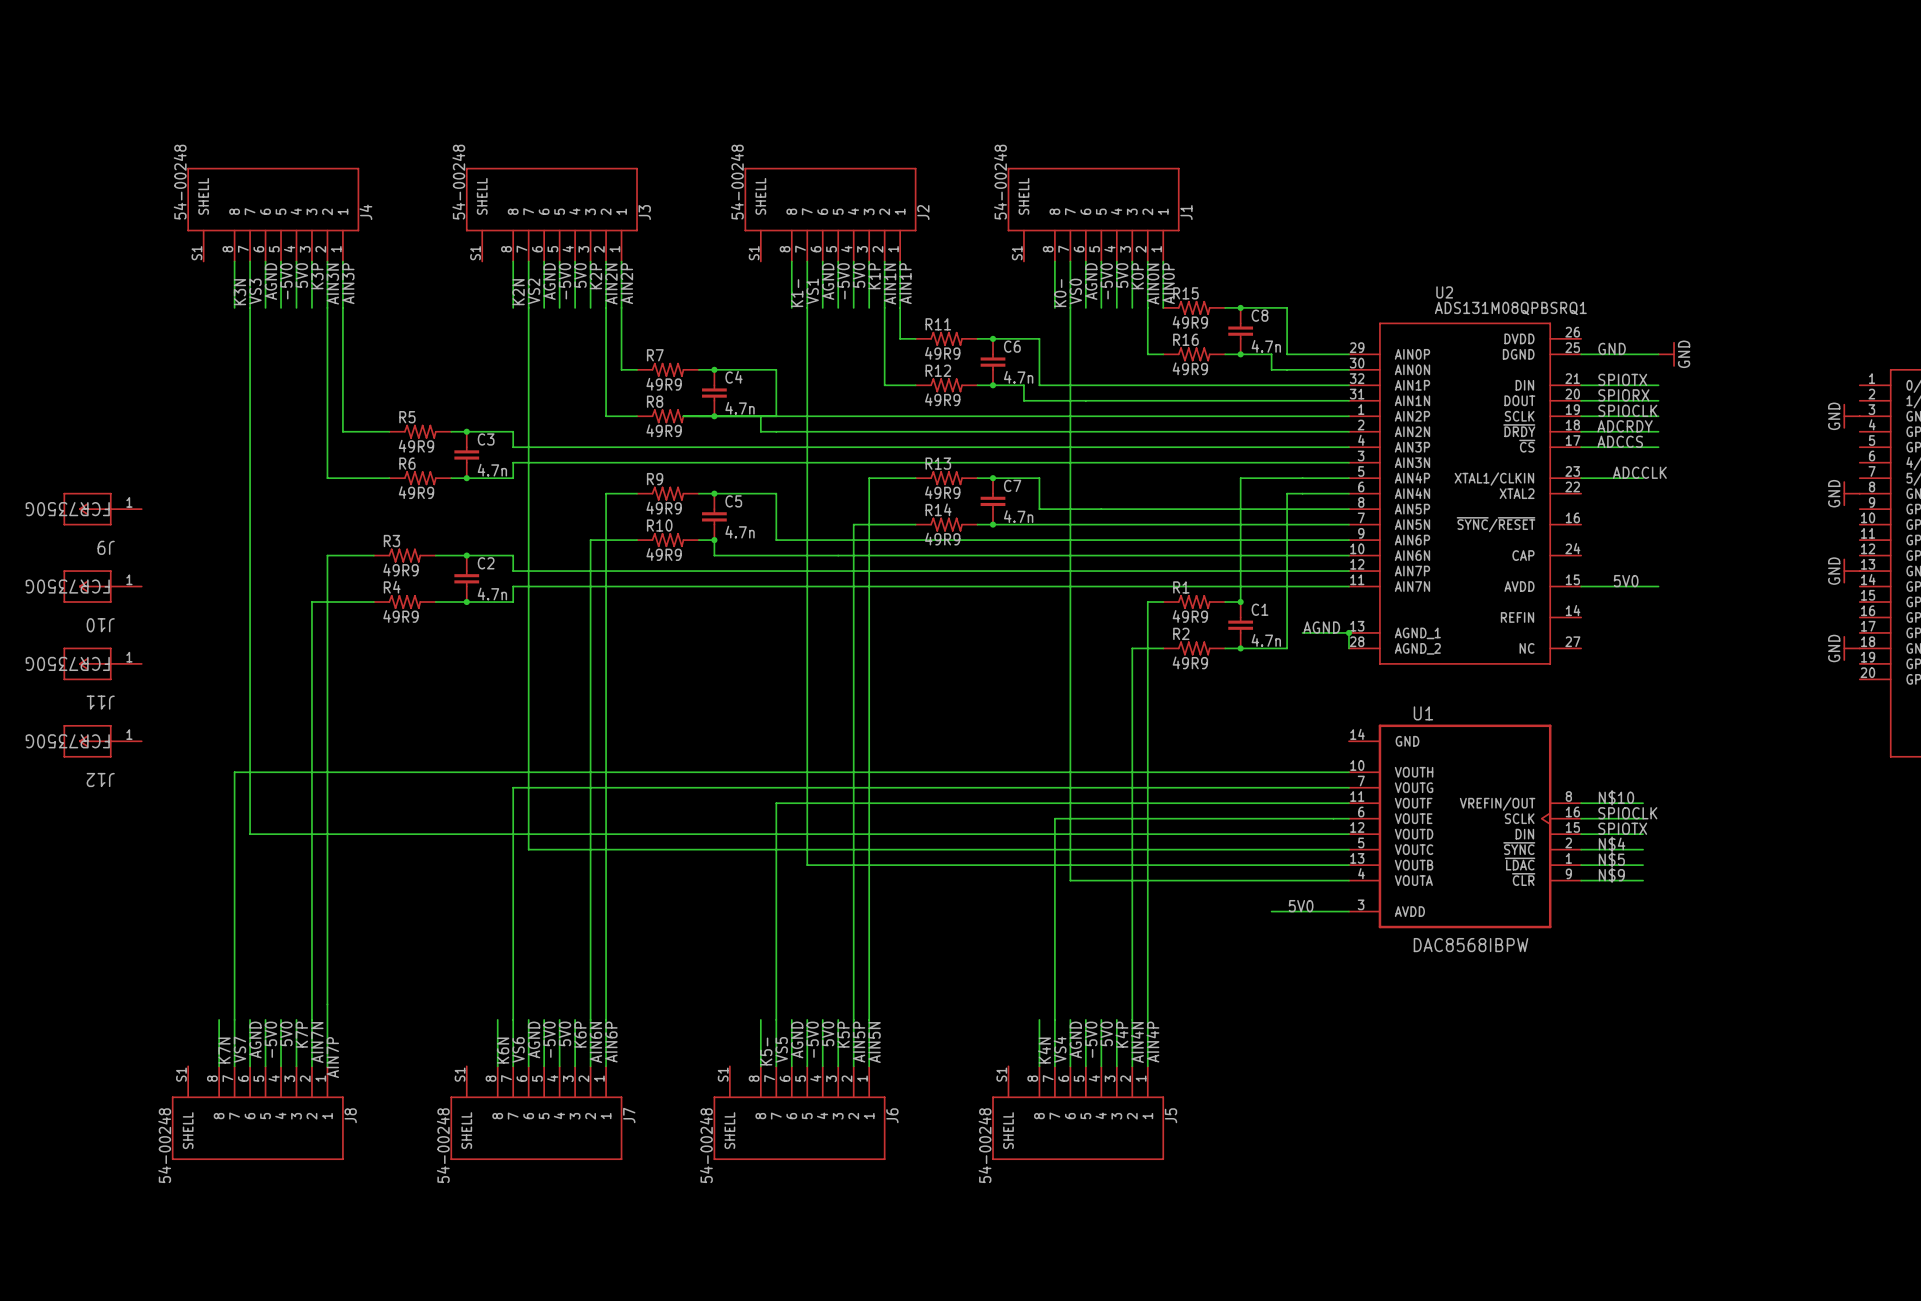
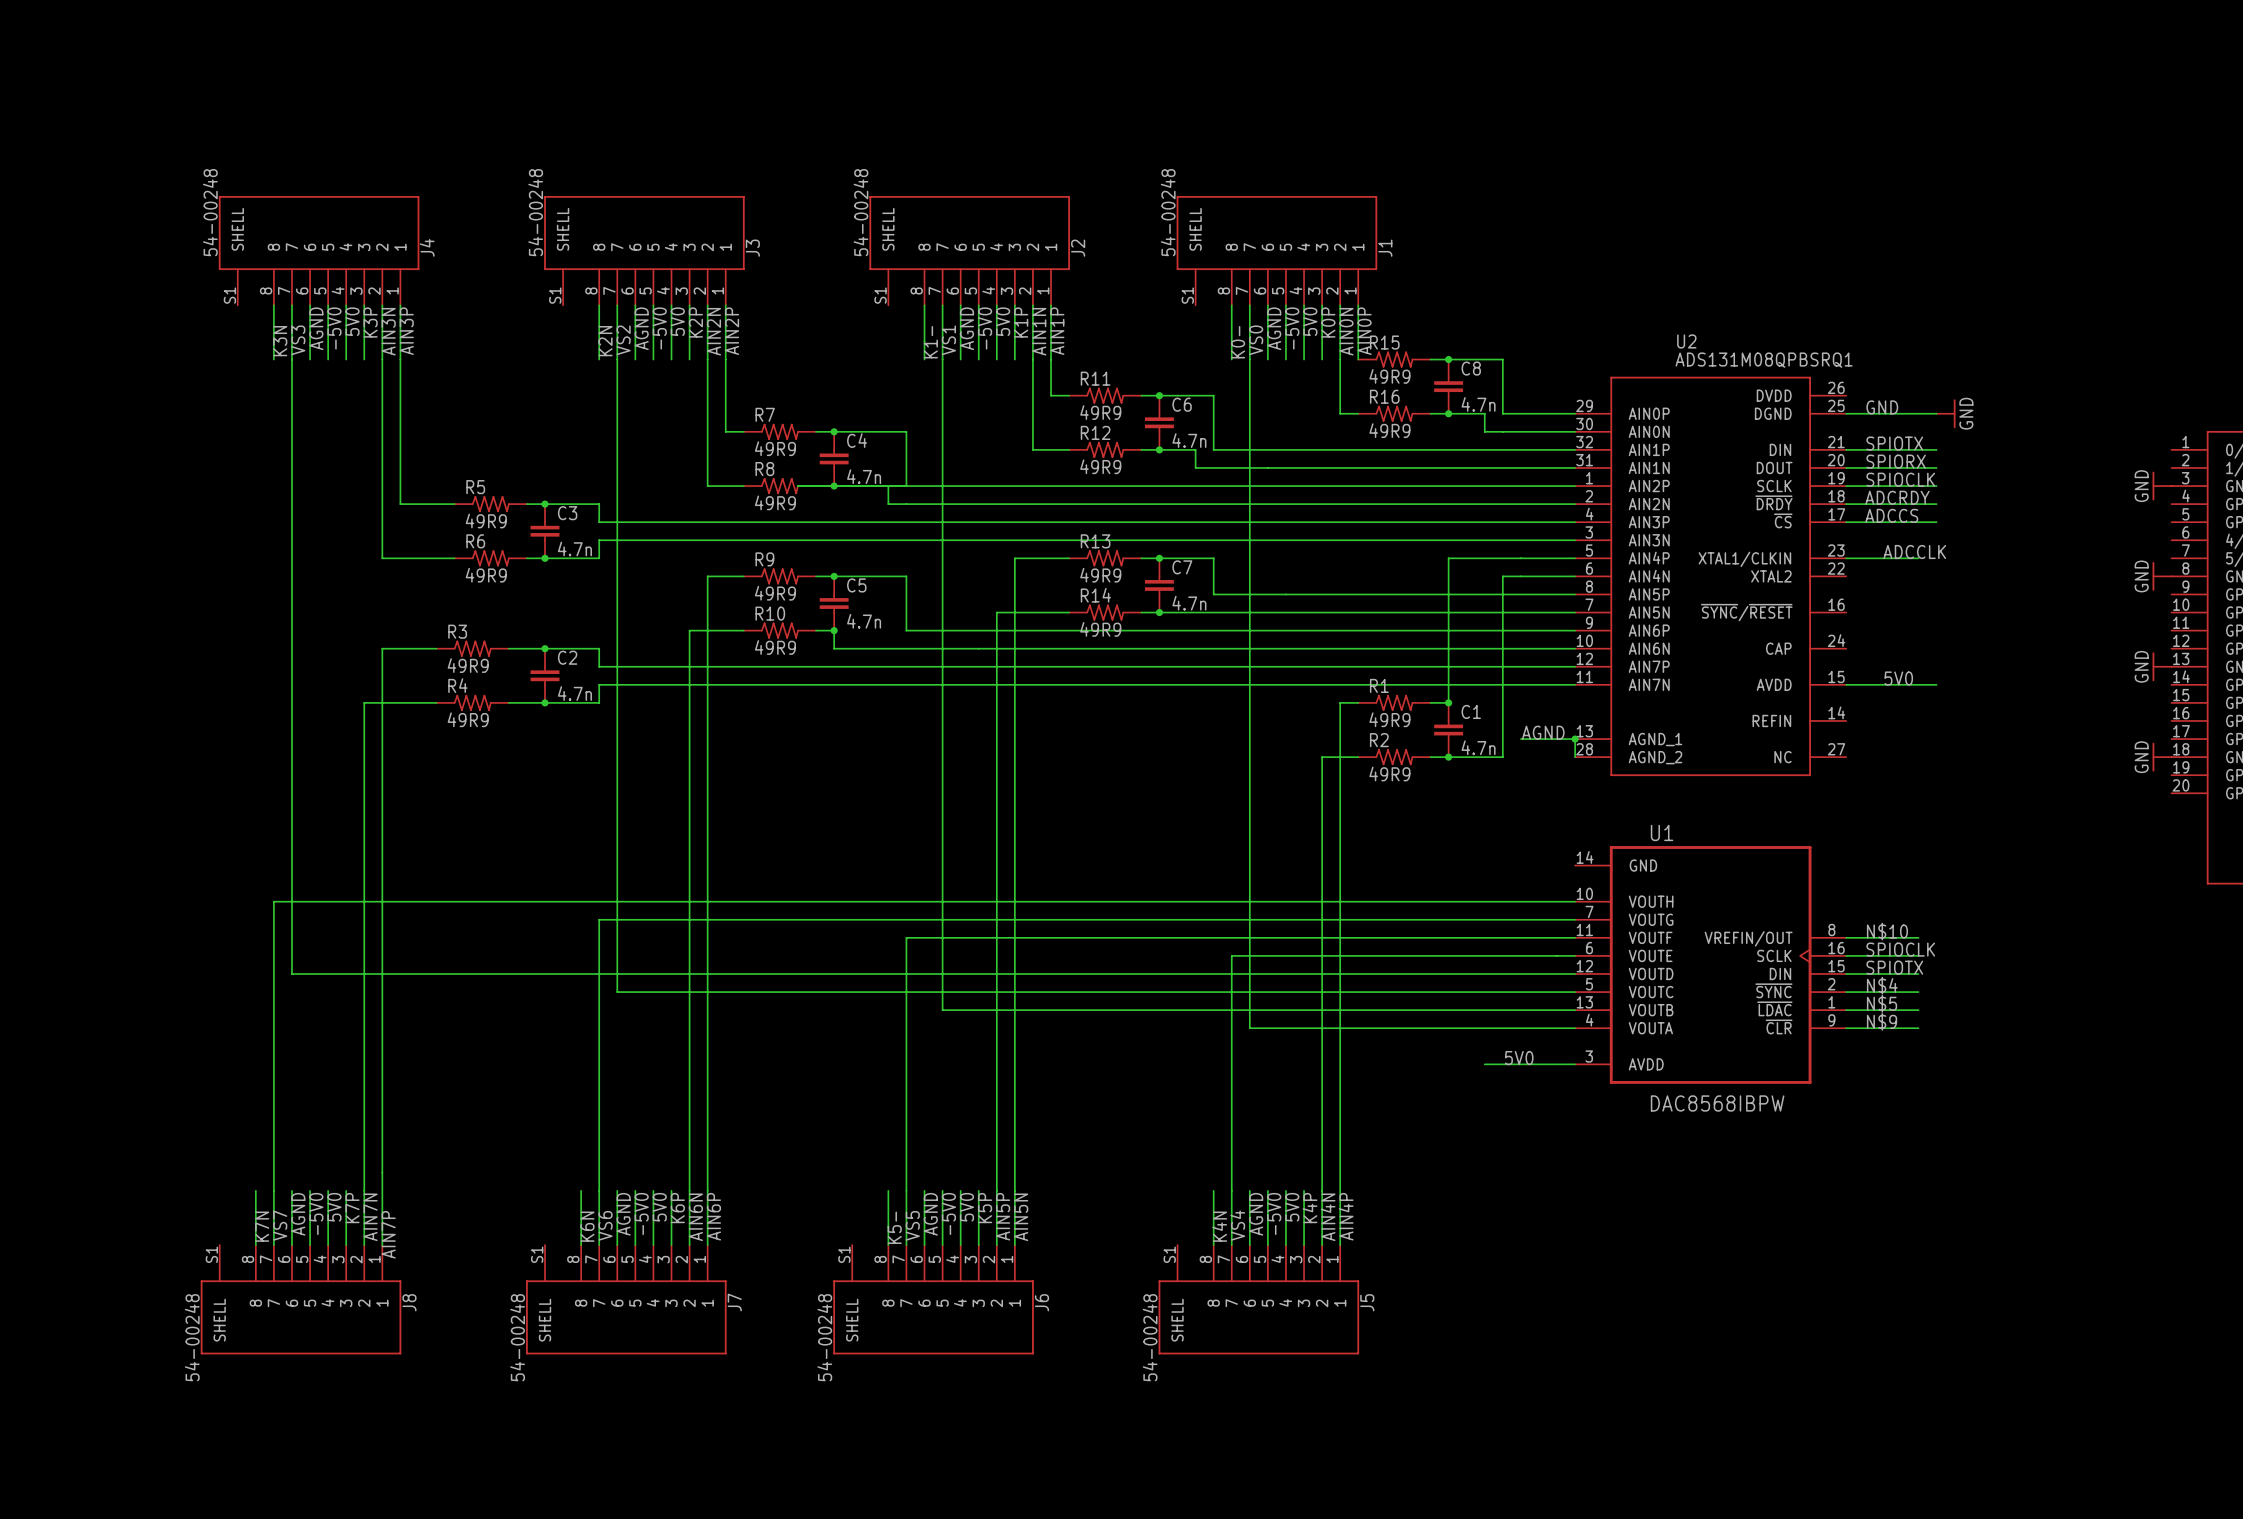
J9: FCR7350G (102, 509) -> none
J10: FCR7350G (102, 586) -> none
J11: FCR7350G (102, 663) -> none
J12: FCR7350G (102, 741) -> none

